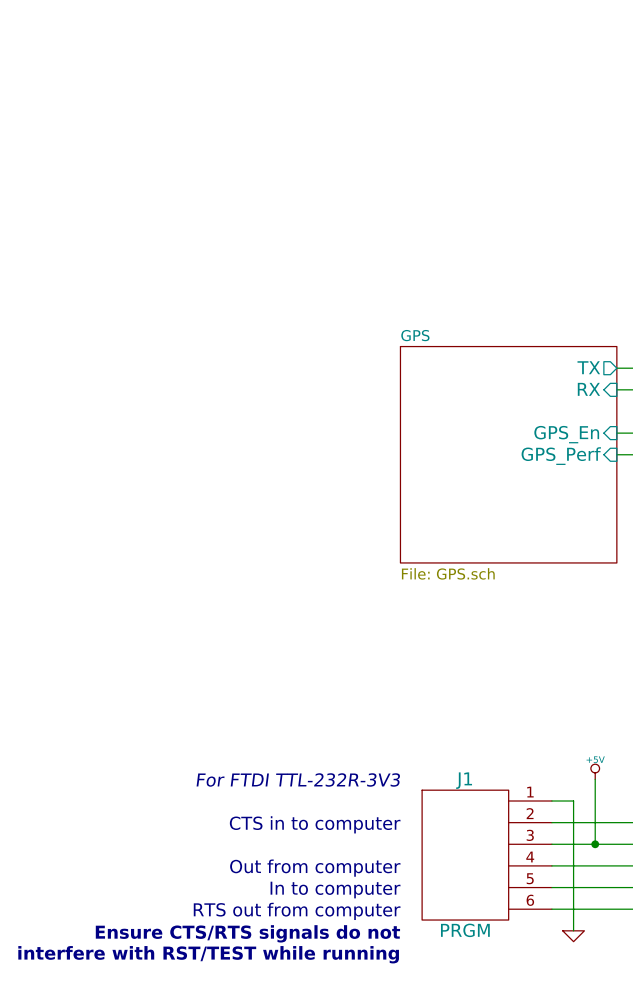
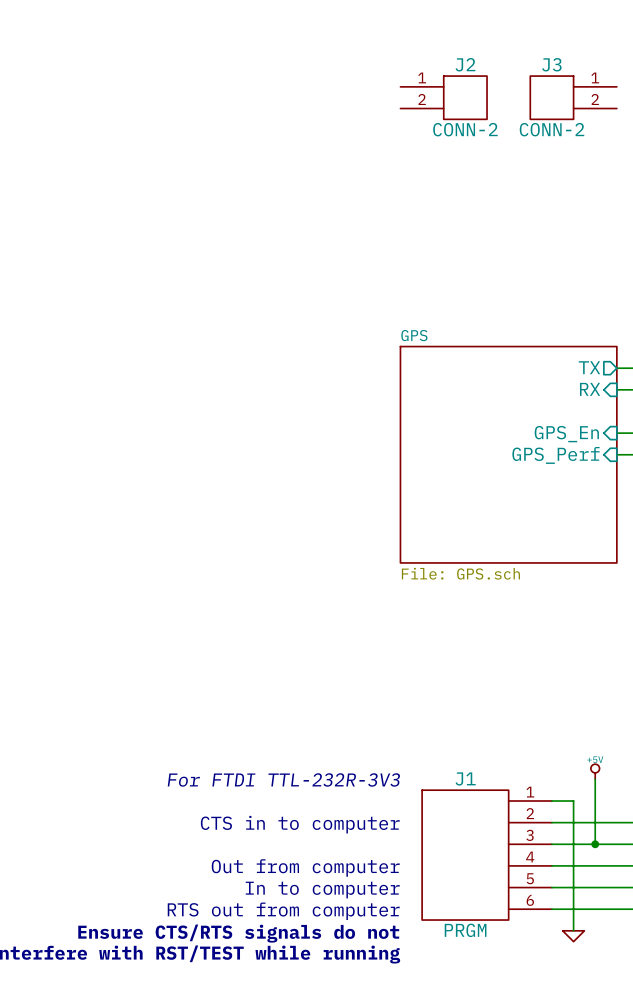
J2: none -> CONN-2 (443, 97)
J3: none -> CONN-2 (573, 97)

